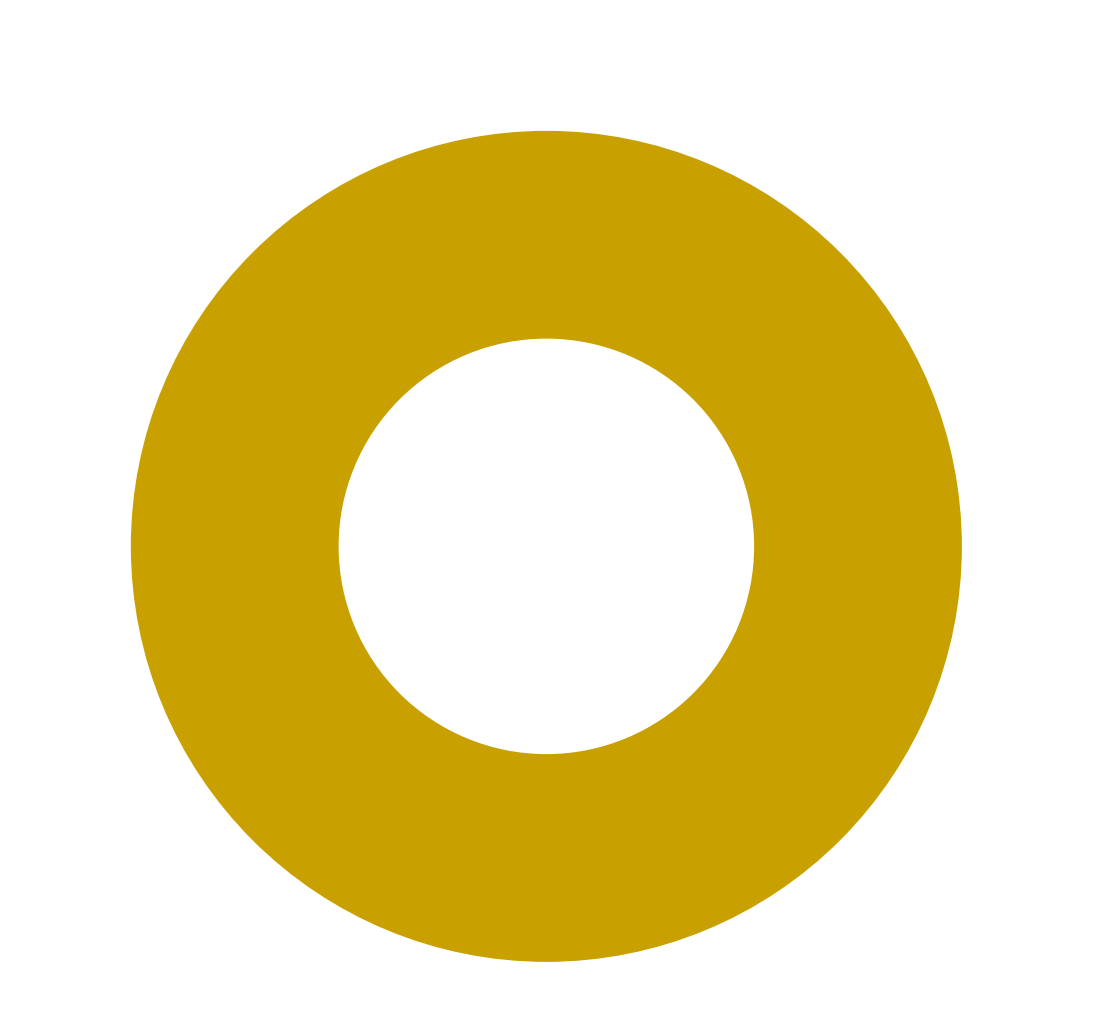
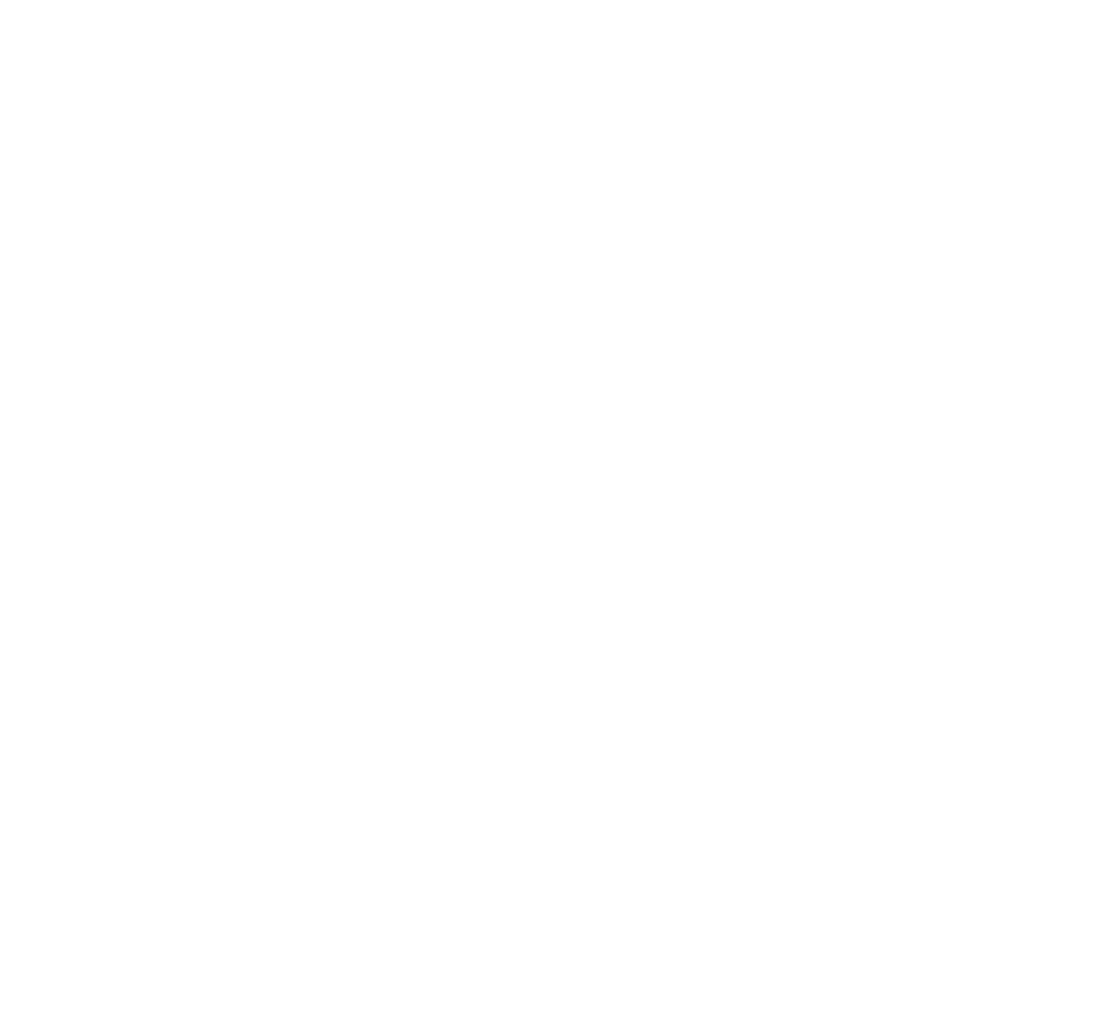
part: (546, 546) -> none

